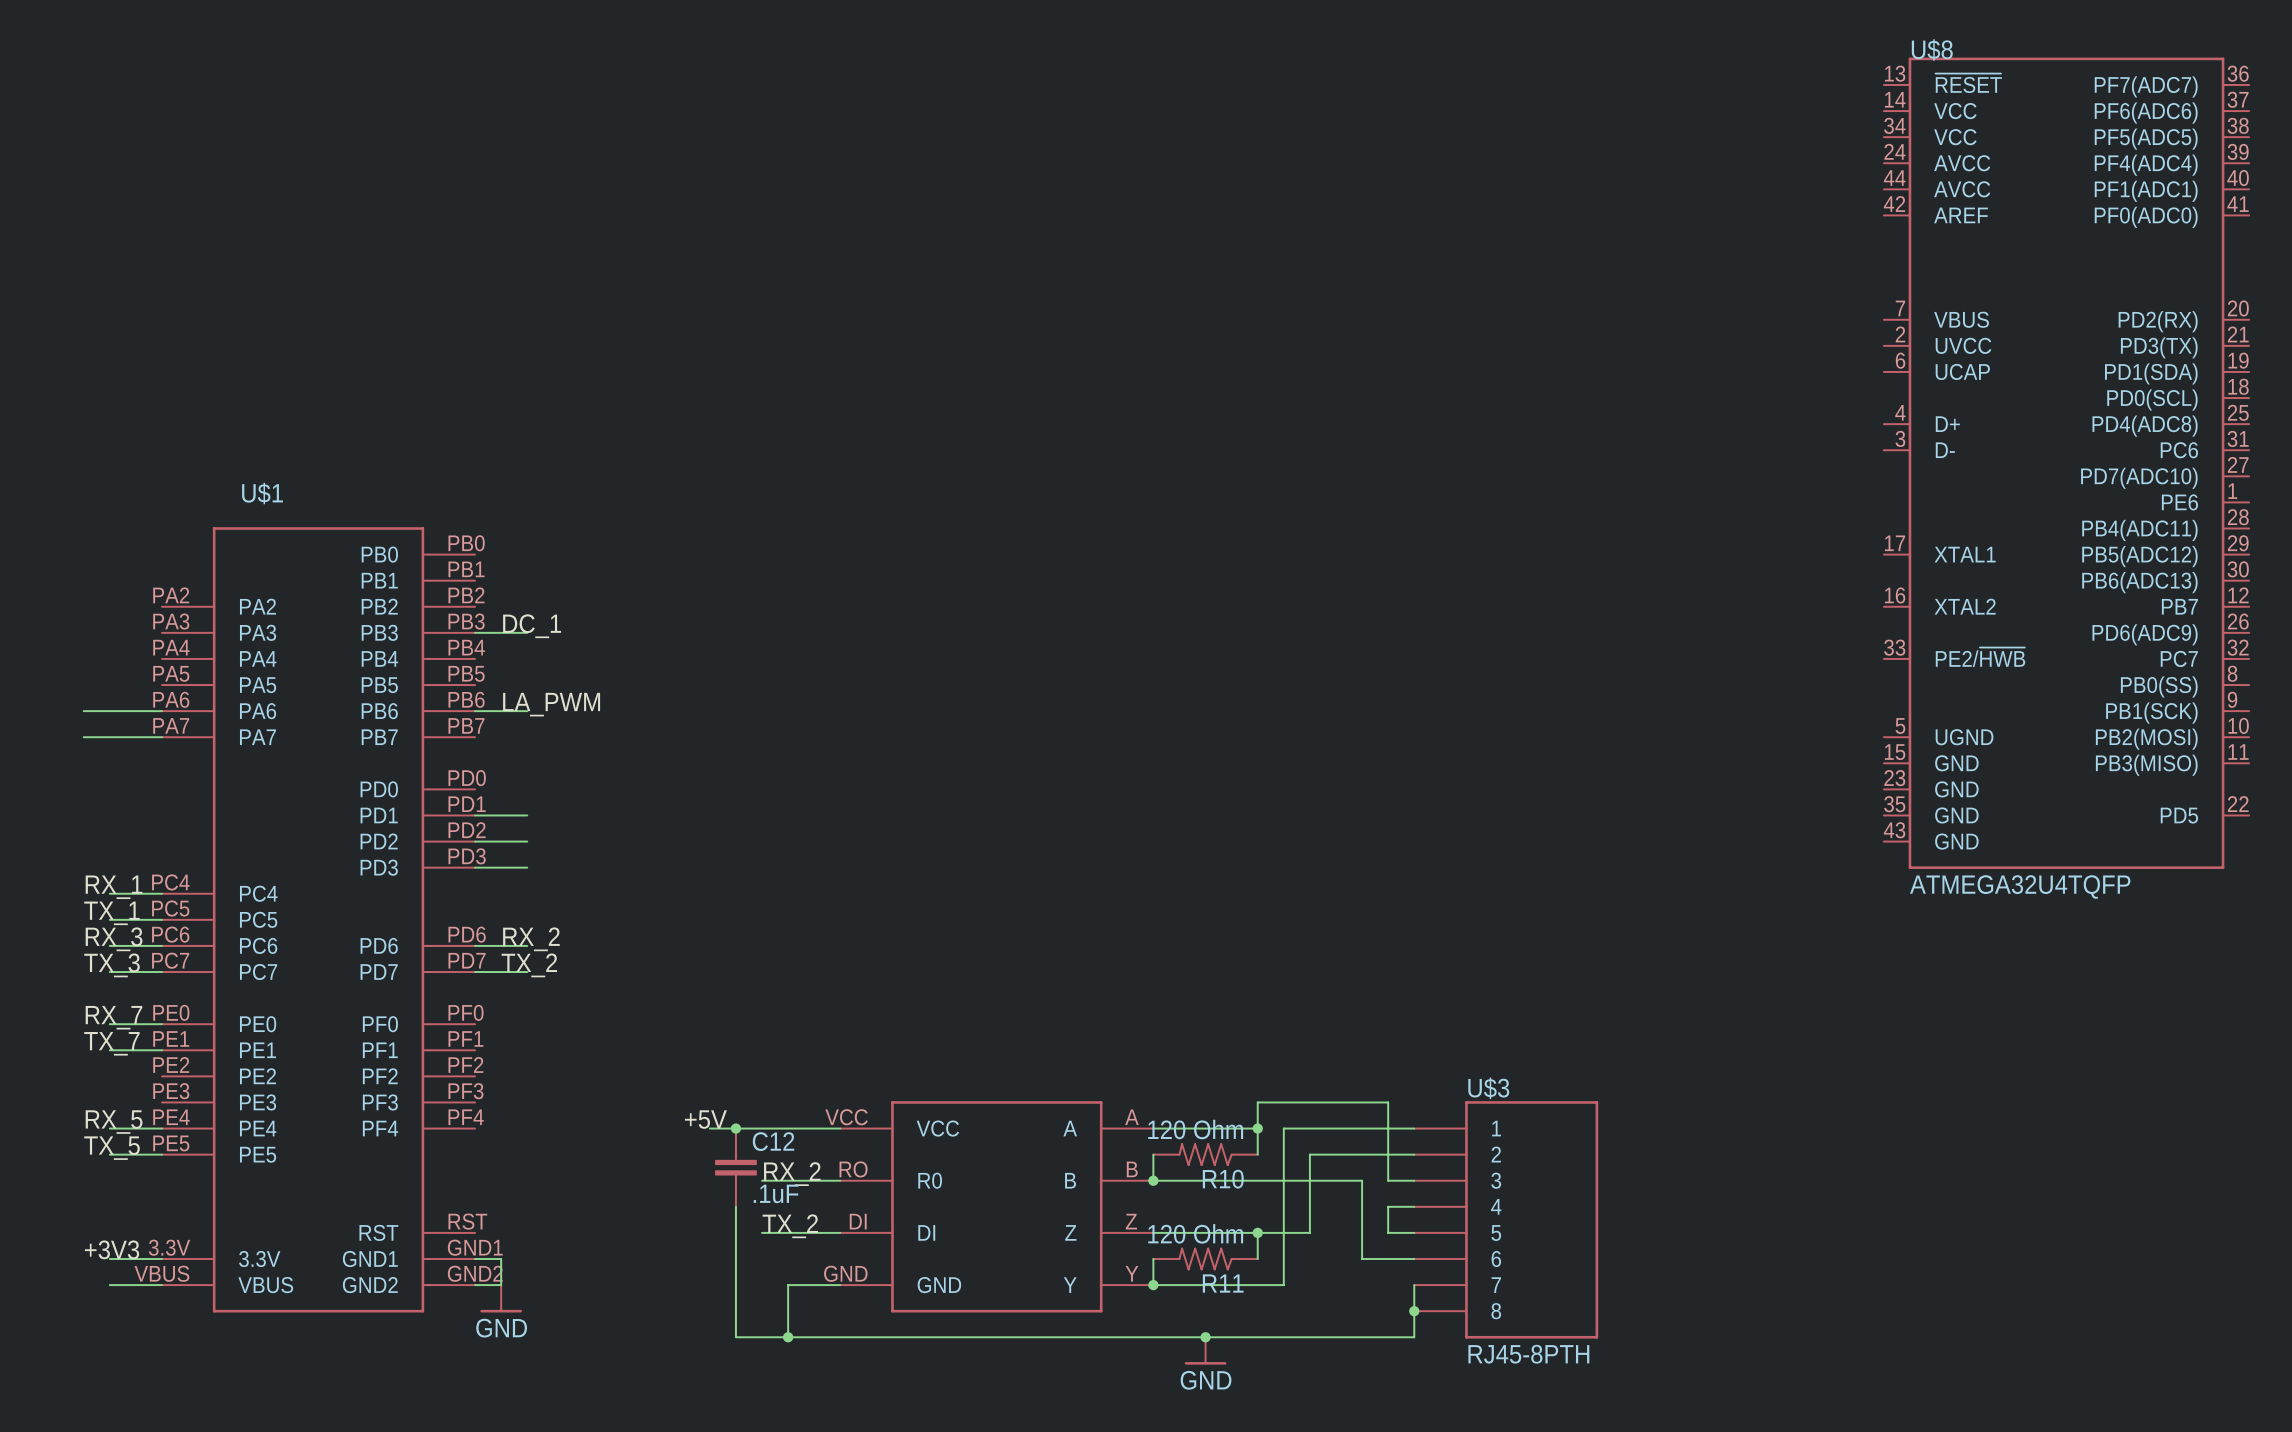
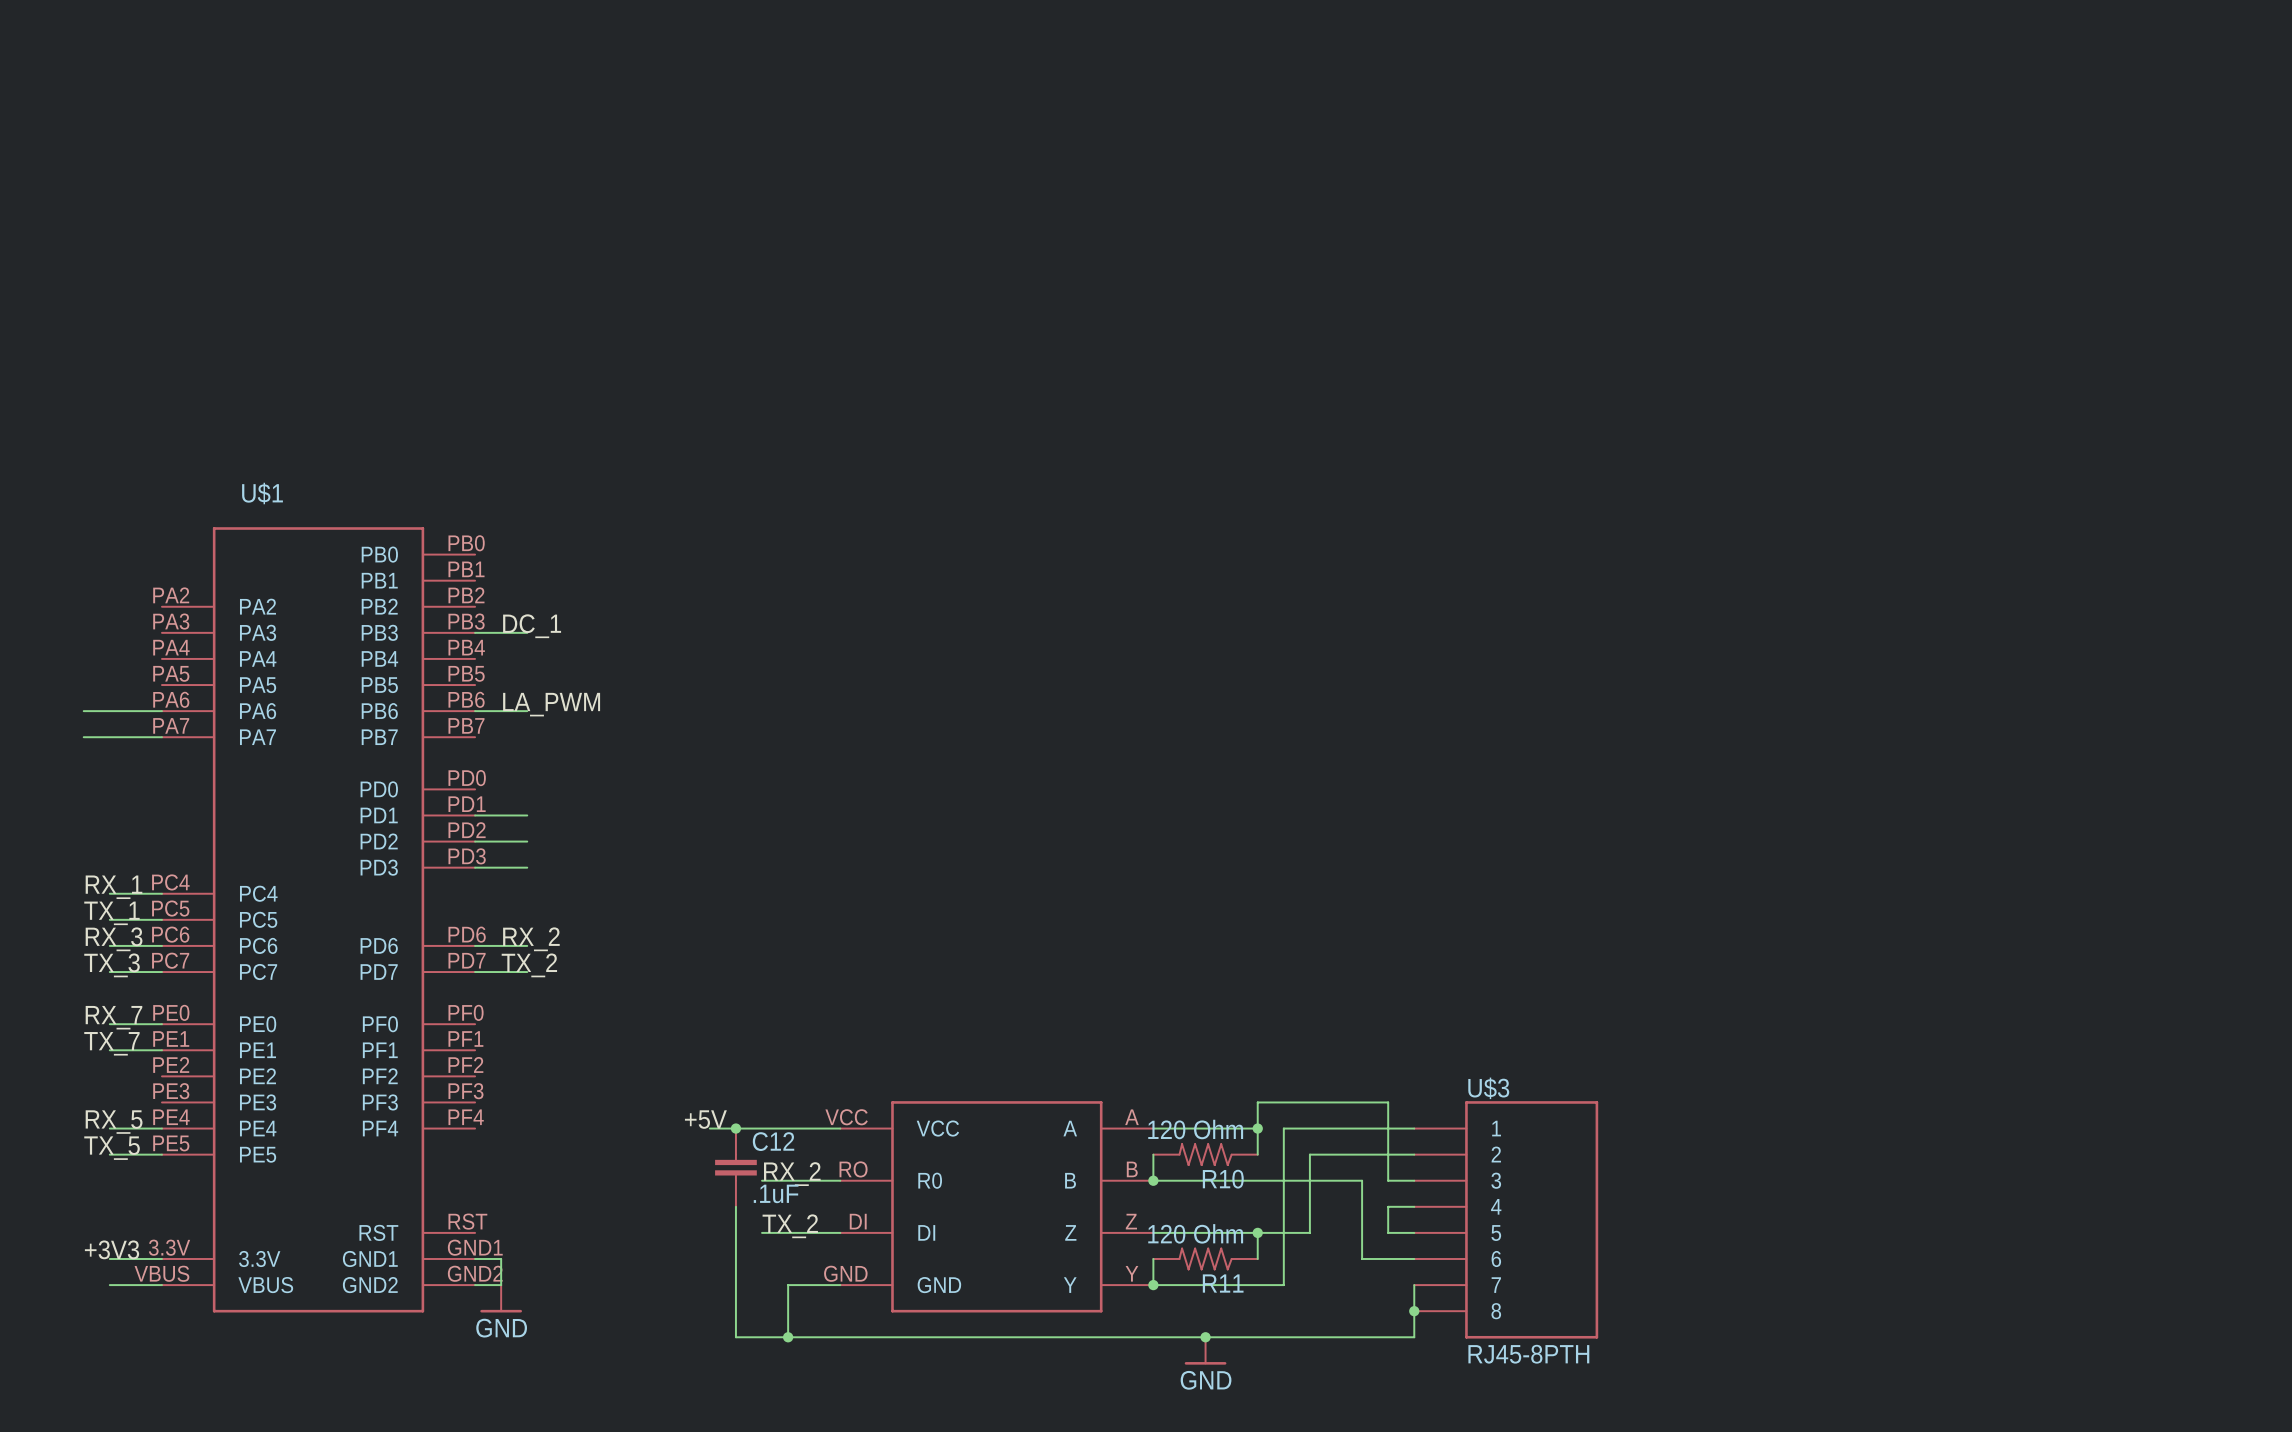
U$8: ATMEGA32U4TQFP (2066, 463) -> none

